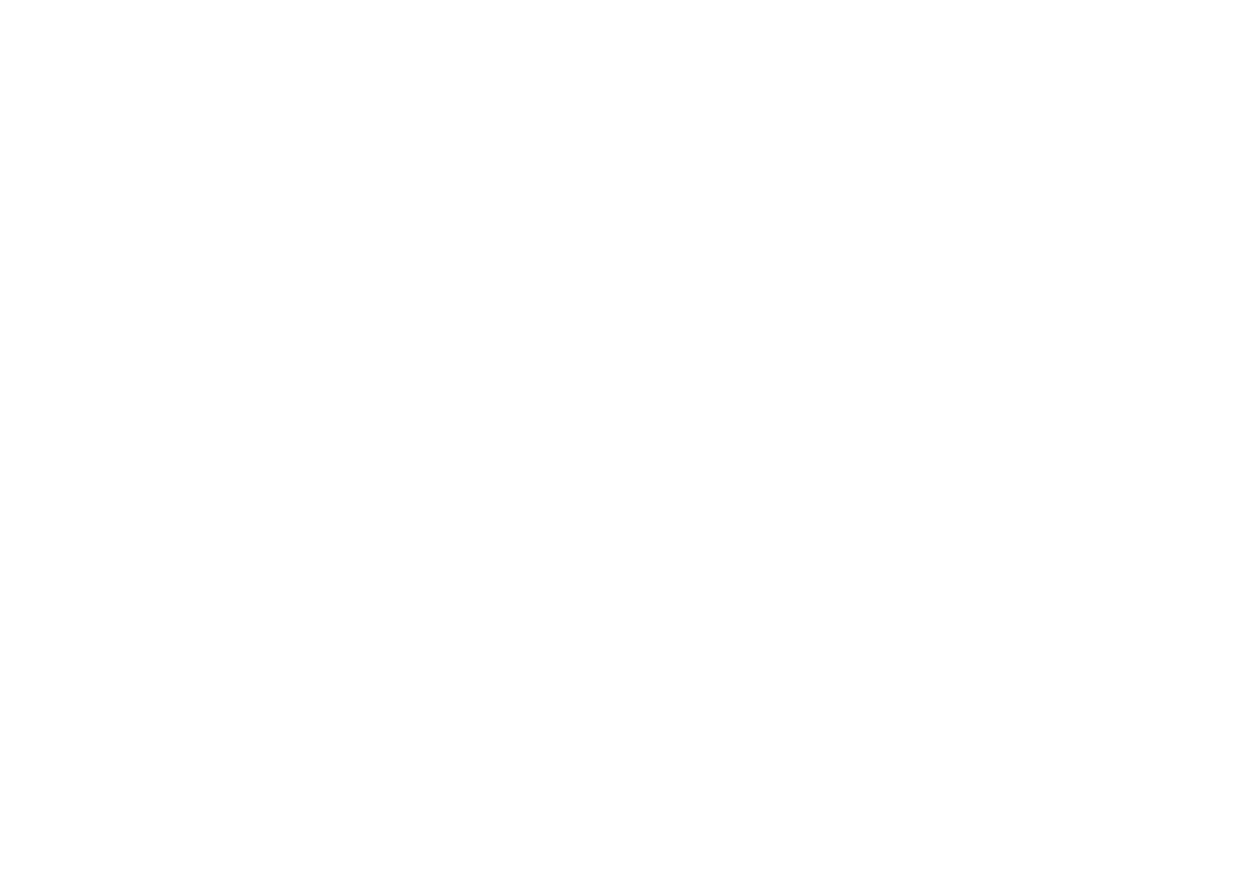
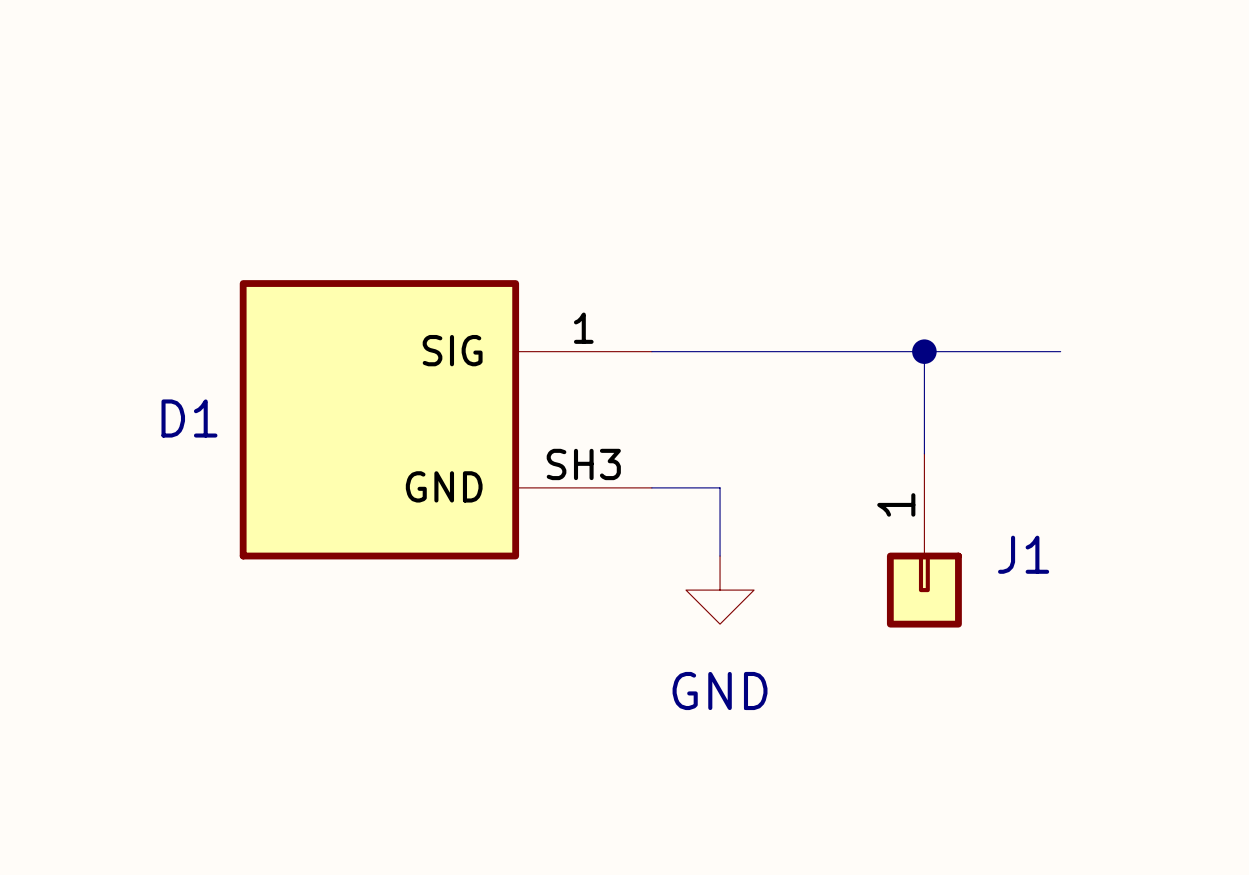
wire: none -> (651, 351) (1060, 351)
wire: none -> (924, 351) (924, 453)
junction: none -> (924, 351)
D1: none -> (445, 419)
wire: none -> (651, 487) (720, 487) (720, 556)
J1: none -> (924, 540)
power symbol: none -> GND (720, 590)

